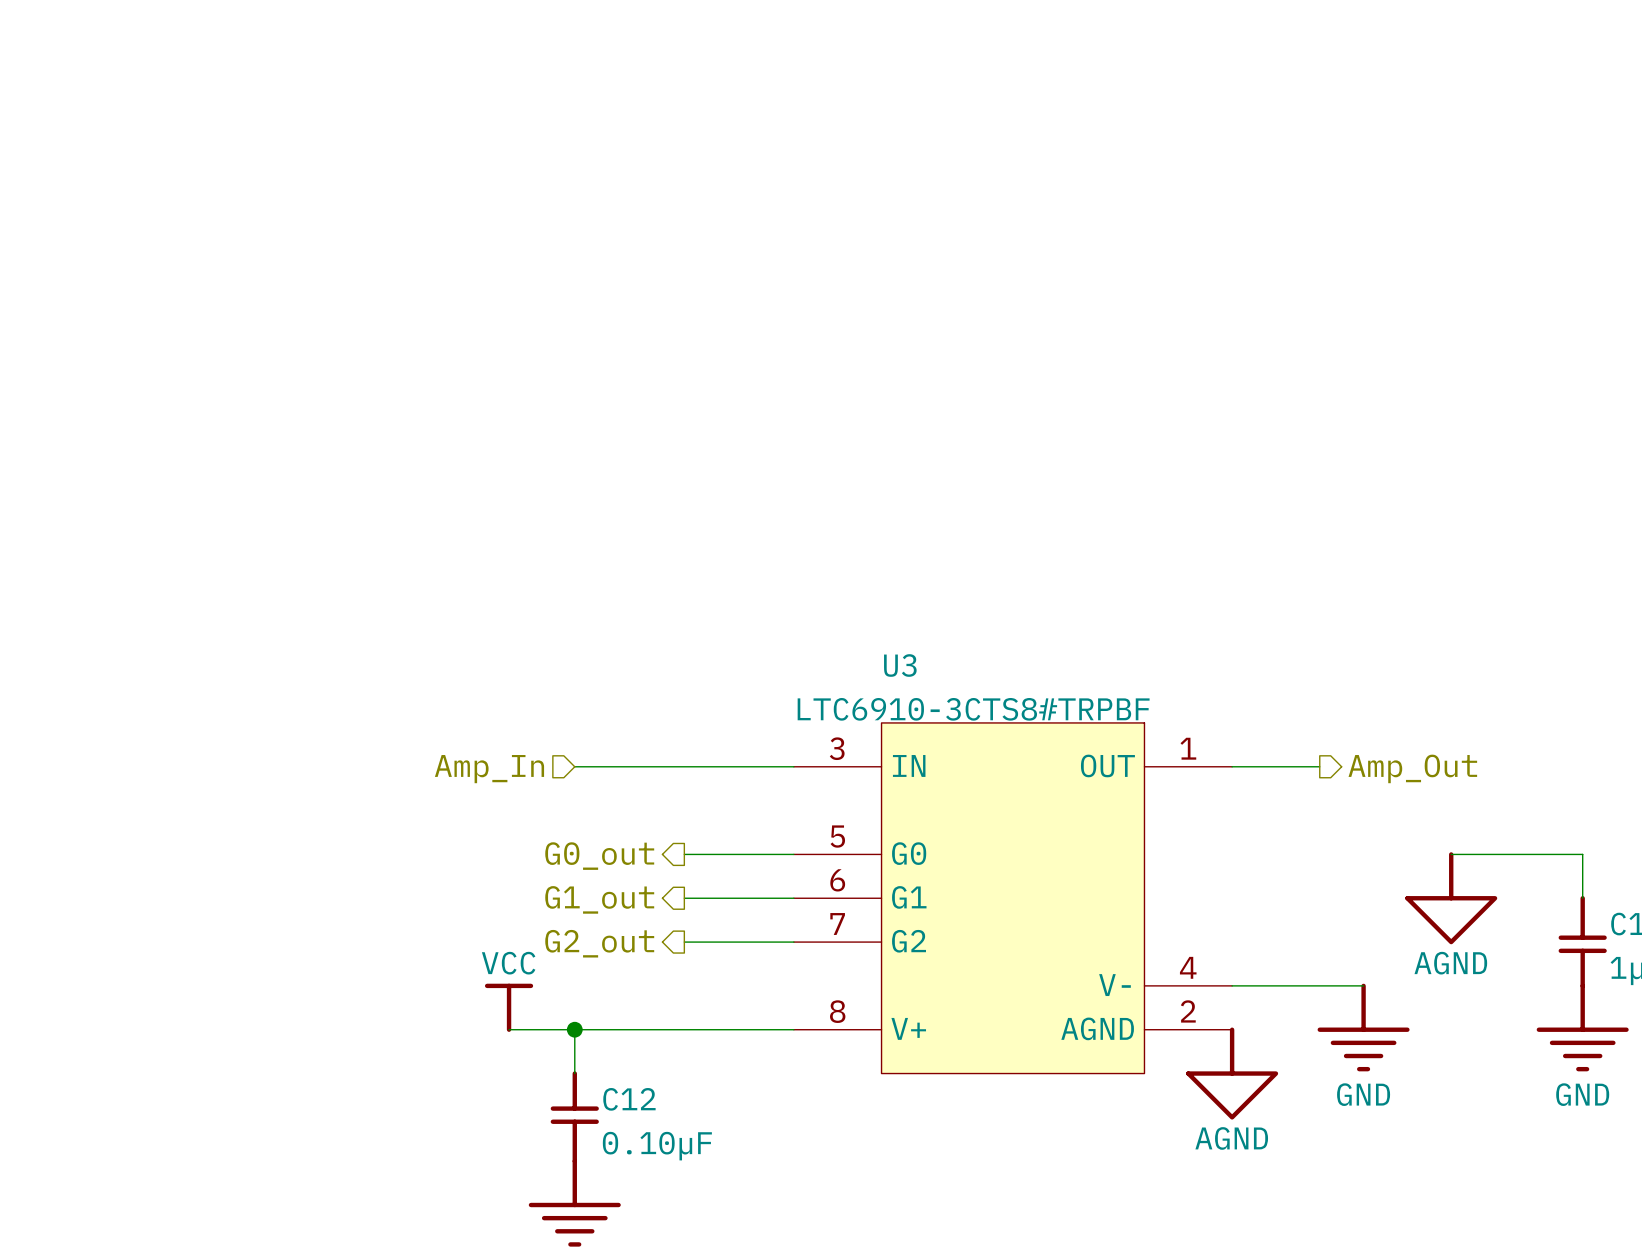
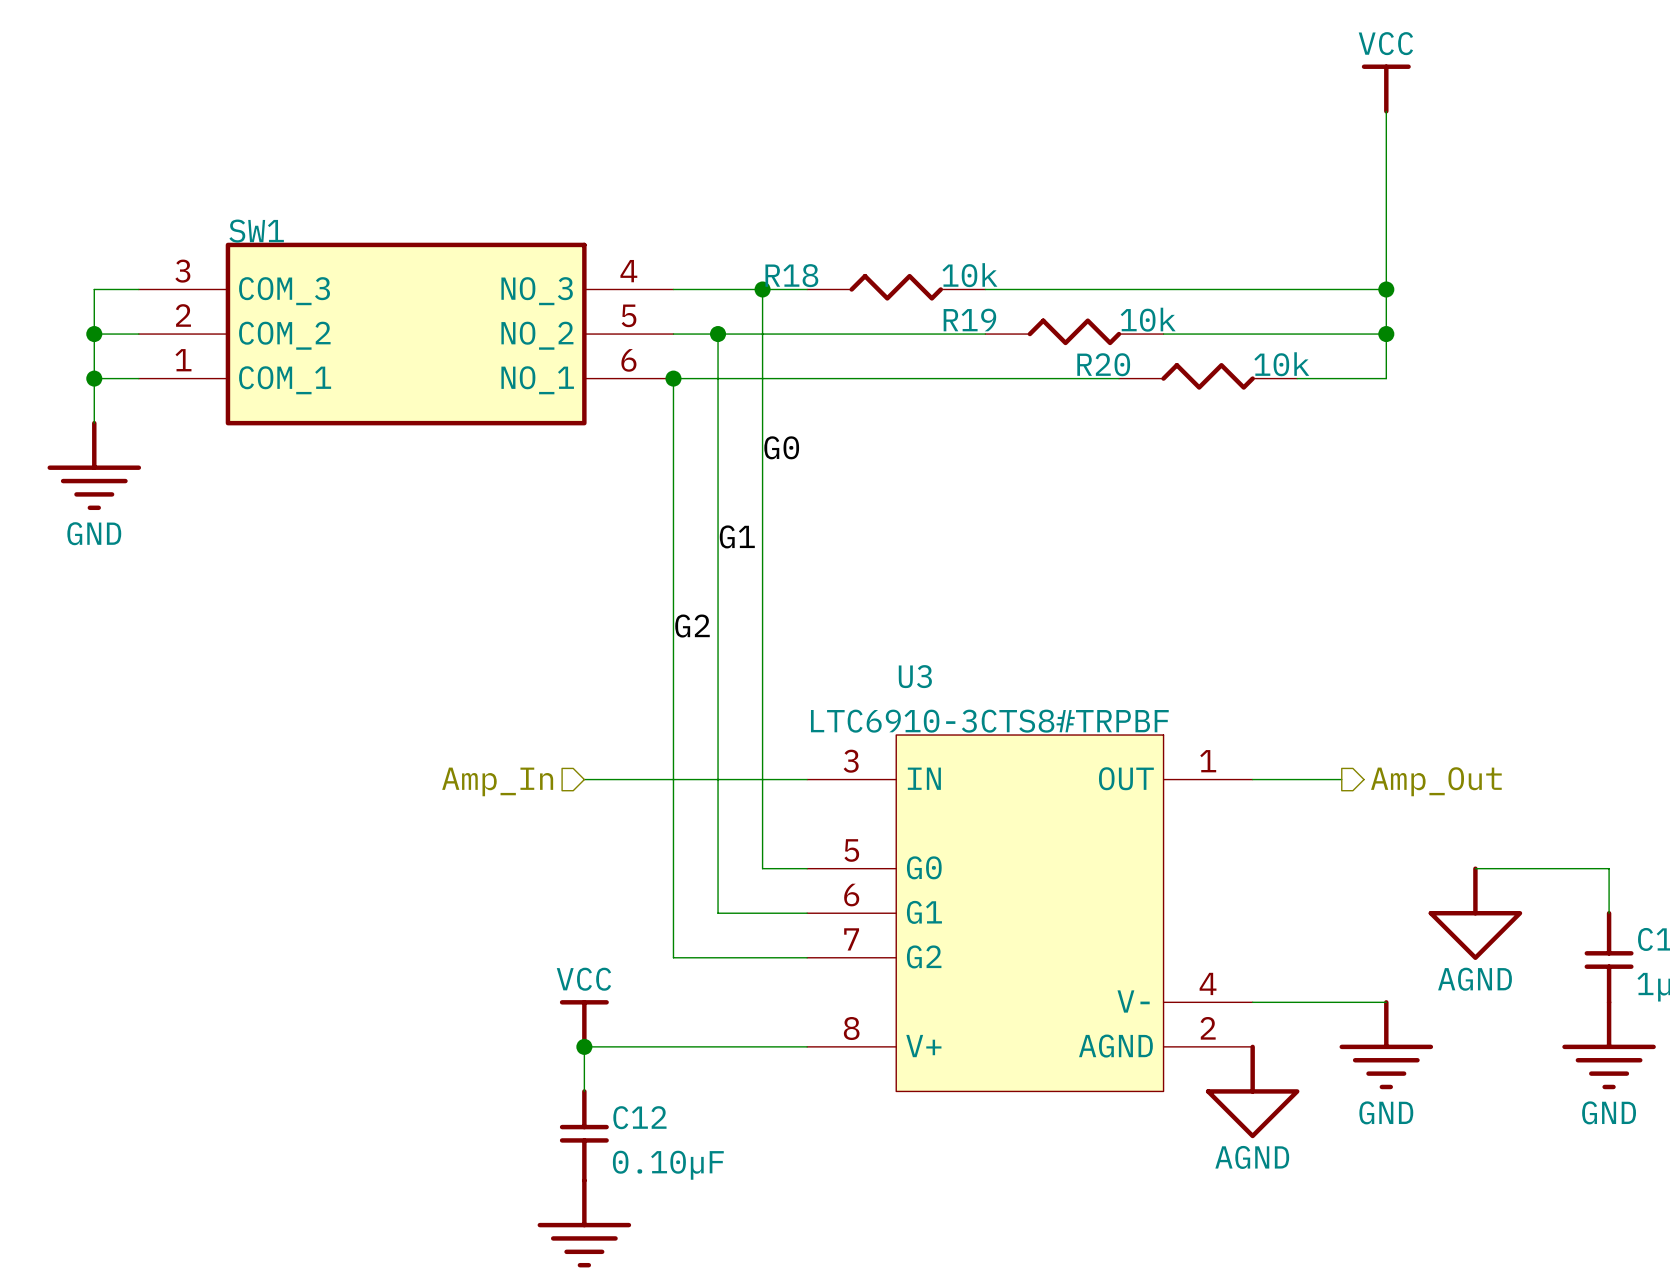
power symbol: none -> VCC (1386, 89)
wire: none -> (1386, 111) (1386, 378) (1297, 378)
R18: none -> 10k (896, 287)
wire: none -> (138, 289) (94, 289) (94, 423)
wire: none -> (673, 289) (807, 289)
junction: none -> (762, 289)
wire: none -> (985, 289) (1386, 289)
junction: none -> (1386, 289)
R19: none -> 10k (1074, 331)
wire: none -> (94, 334) (138, 334)
junction: none -> (94, 334)
SW1: none -> (406, 334)
wire: none -> (673, 334) (985, 334)
junction: none -> (718, 334)
wire: none -> (1163, 334) (1386, 334)
junction: none -> (1386, 334)
R20: none -> 10k (1208, 376)
wire: none -> (94, 378) (138, 378)
junction: none -> (94, 378)
junction: none -> (673, 378)
wire: none -> (1118, 378) (673, 378) (673, 957) (695, 957)
label: none -> G0 (781, 447)
power symbol: none -> GND (94, 465)
label: none -> G1 (737, 536)
label: none -> G2 (692, 626)
wire: (684, 854) (750, 854) -> (762, 289) (762, 868)
hierarchical label: G0_out (599, 856) -> none
wire: (684, 898) (706, 898) -> (718, 334) (718, 913)
hierarchical label: G1_out (599, 899) -> none
hierarchical label: G2_out (599, 943) -> none
power symbol position: VCC (509, 1007) -> VCC (584, 1024)
wire: (509, 1029) (574, 1029) -> none

